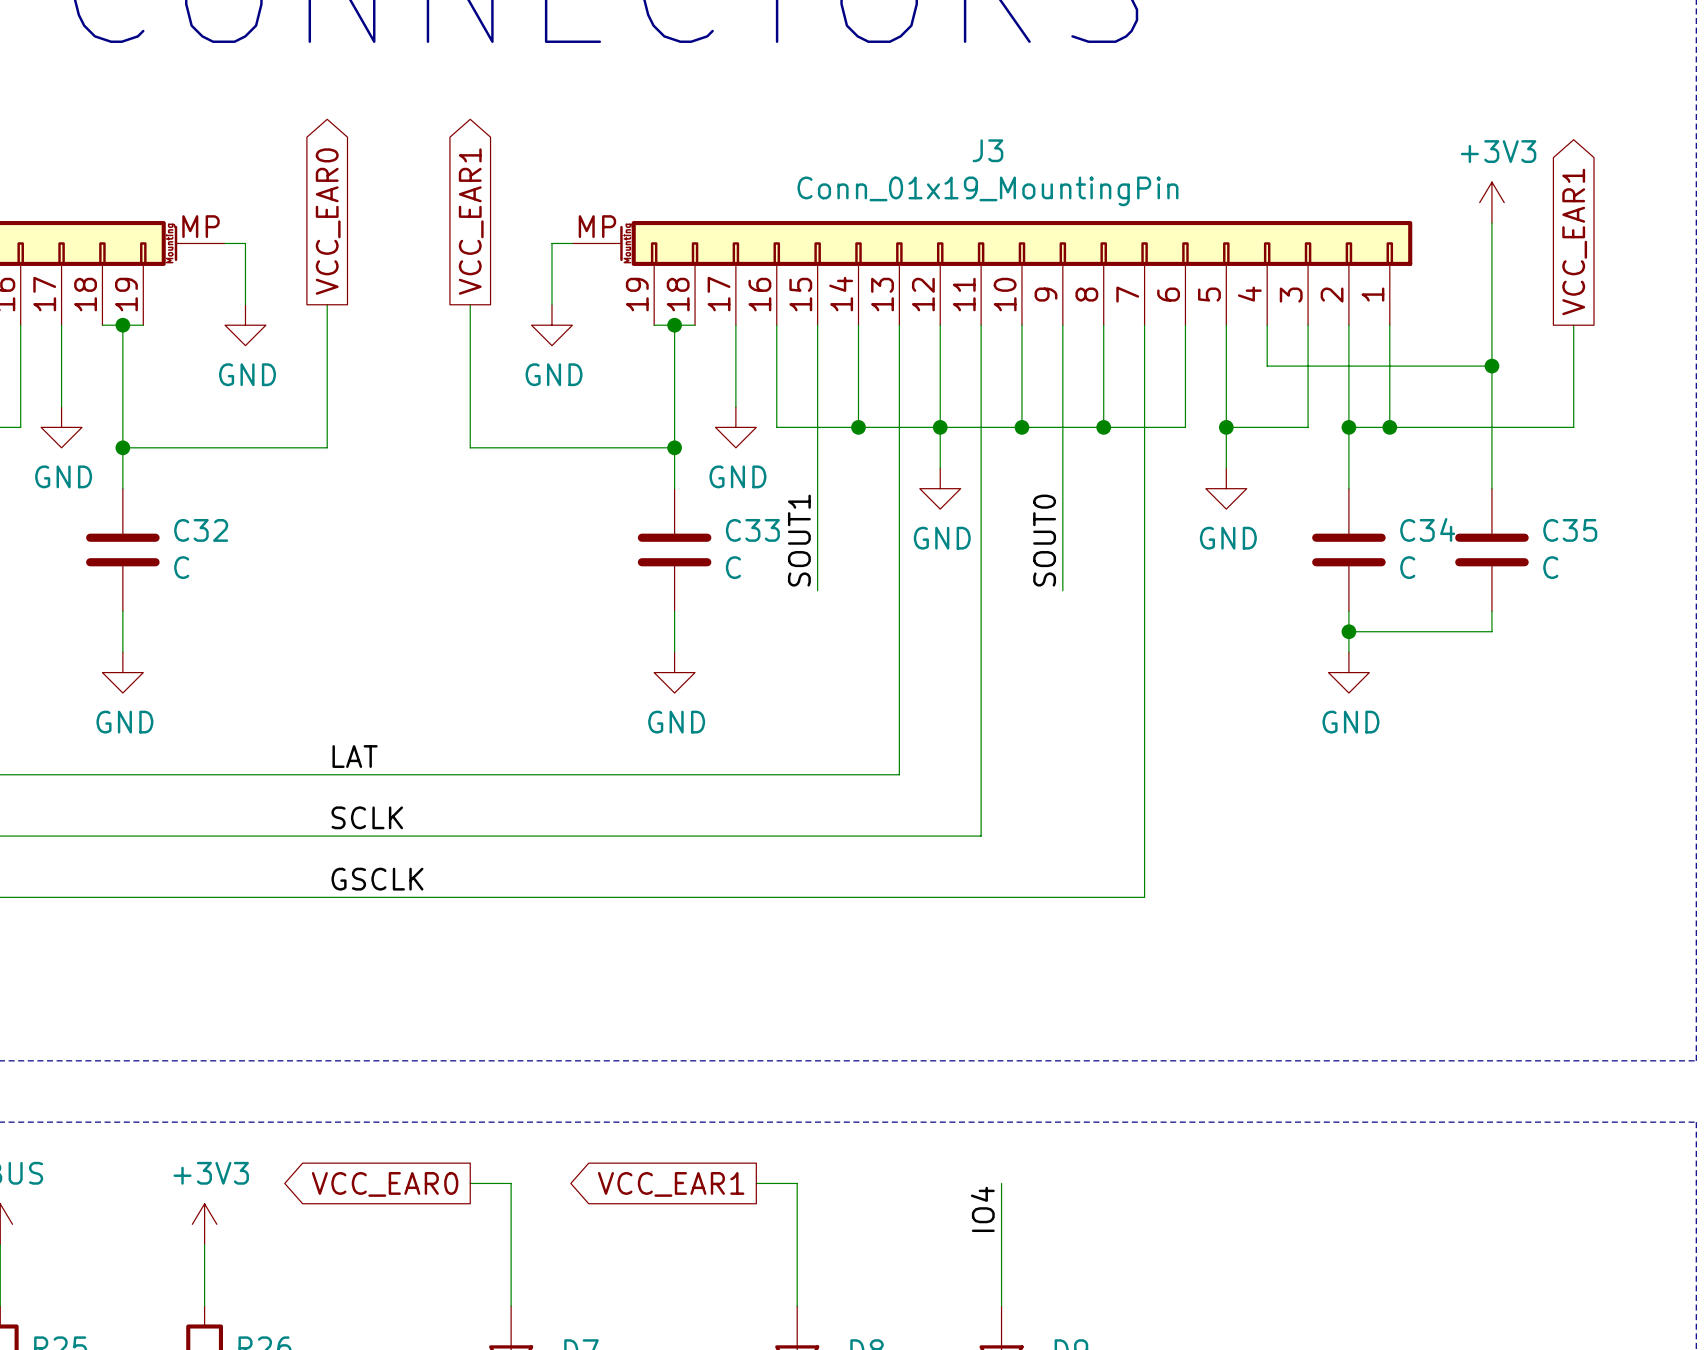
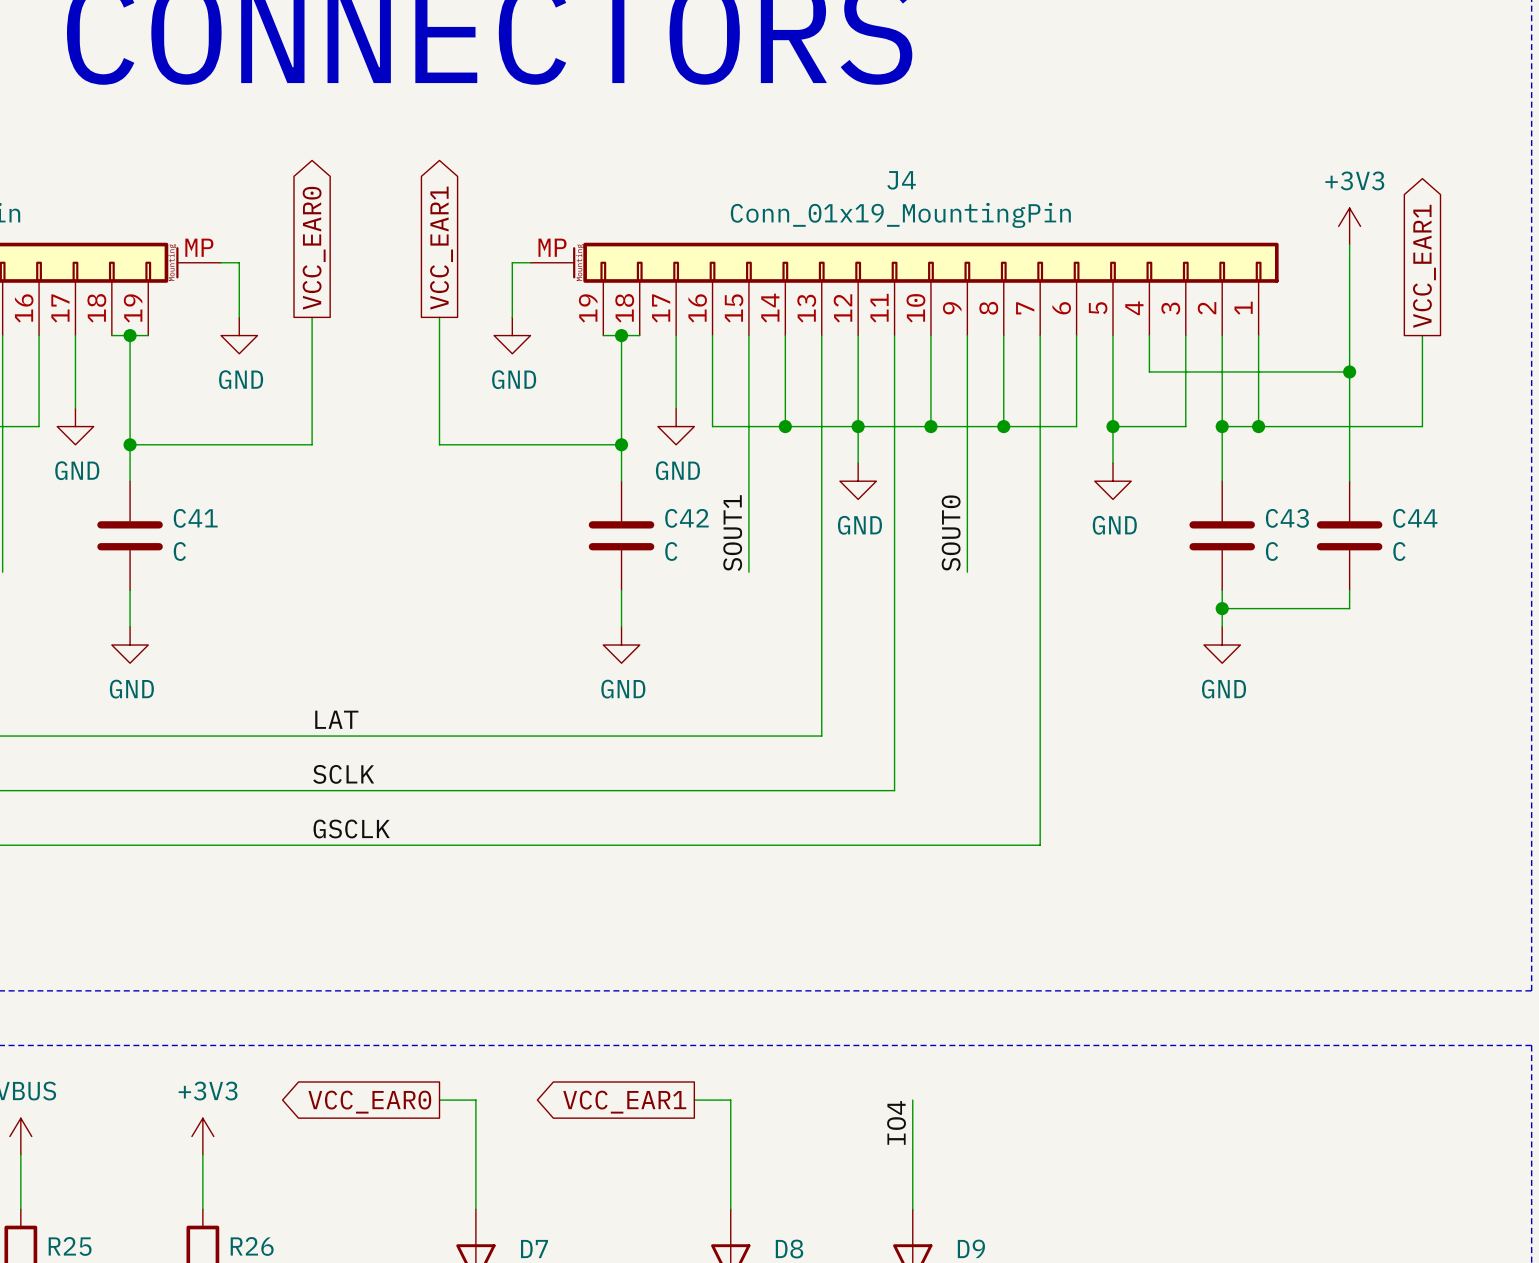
J3 name: J3 (987, 150) -> J4 (901, 180)
C34 name: C34 (1427, 529) -> C43 (1287, 518)
C32 name: C32 (201, 530) -> C41 (195, 518)
C33 name: C33 (752, 530) -> C42 (686, 518)
C35 name: C35 (1570, 530) -> C44 (1415, 518)

